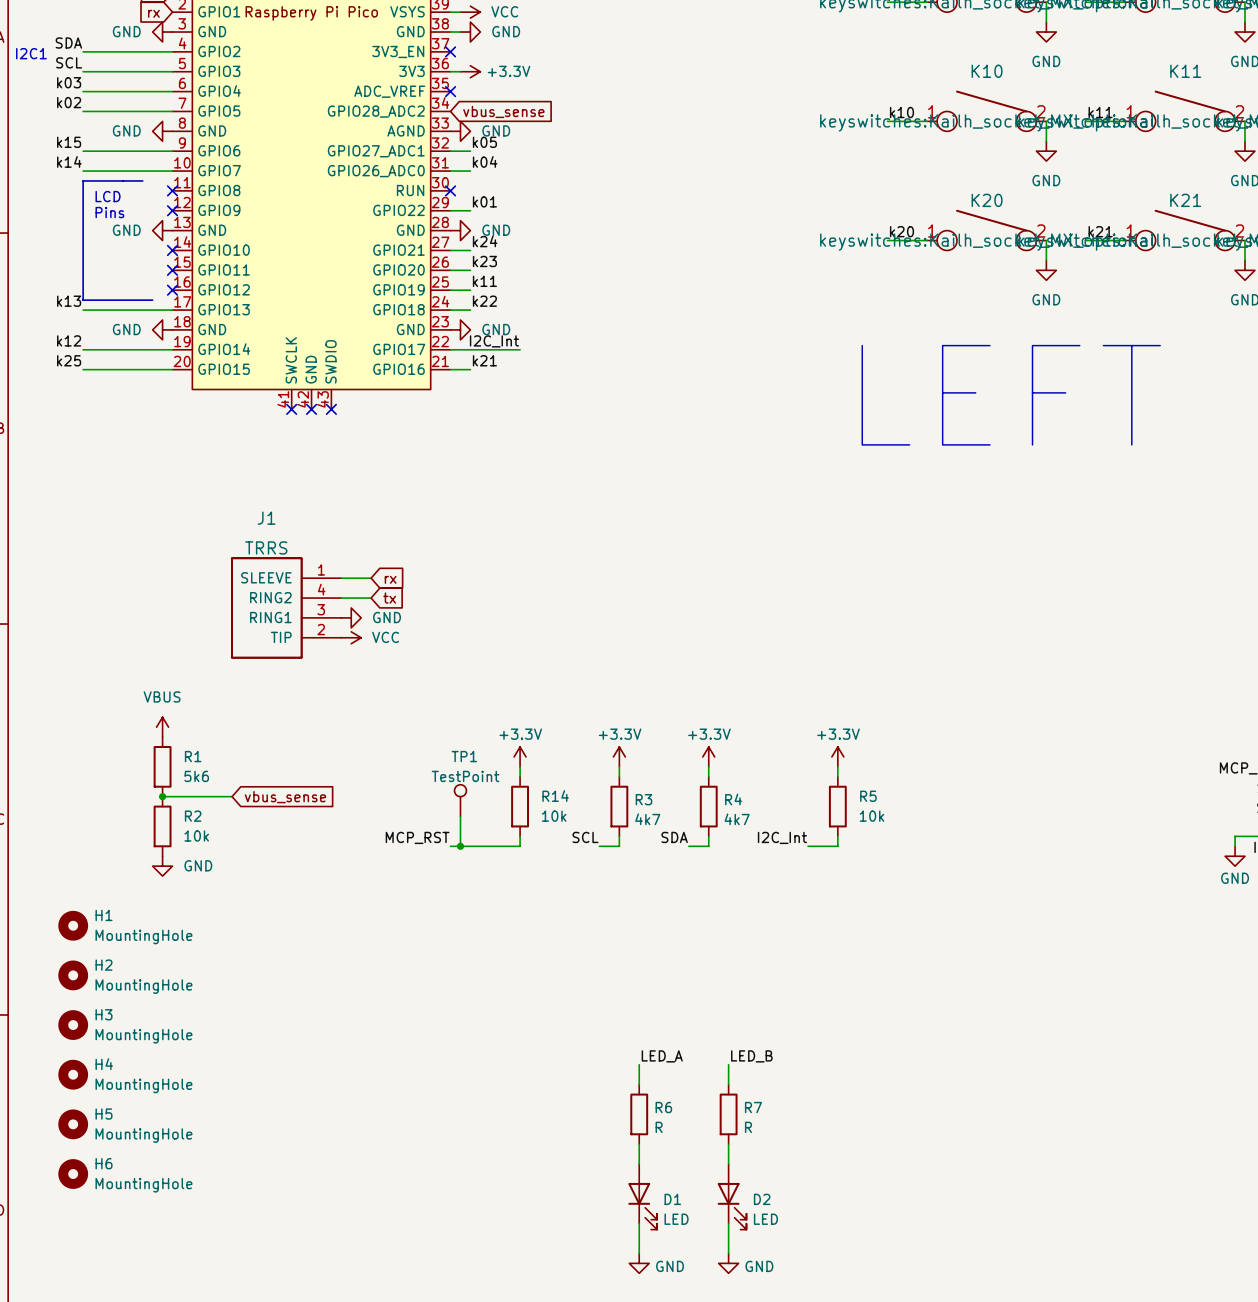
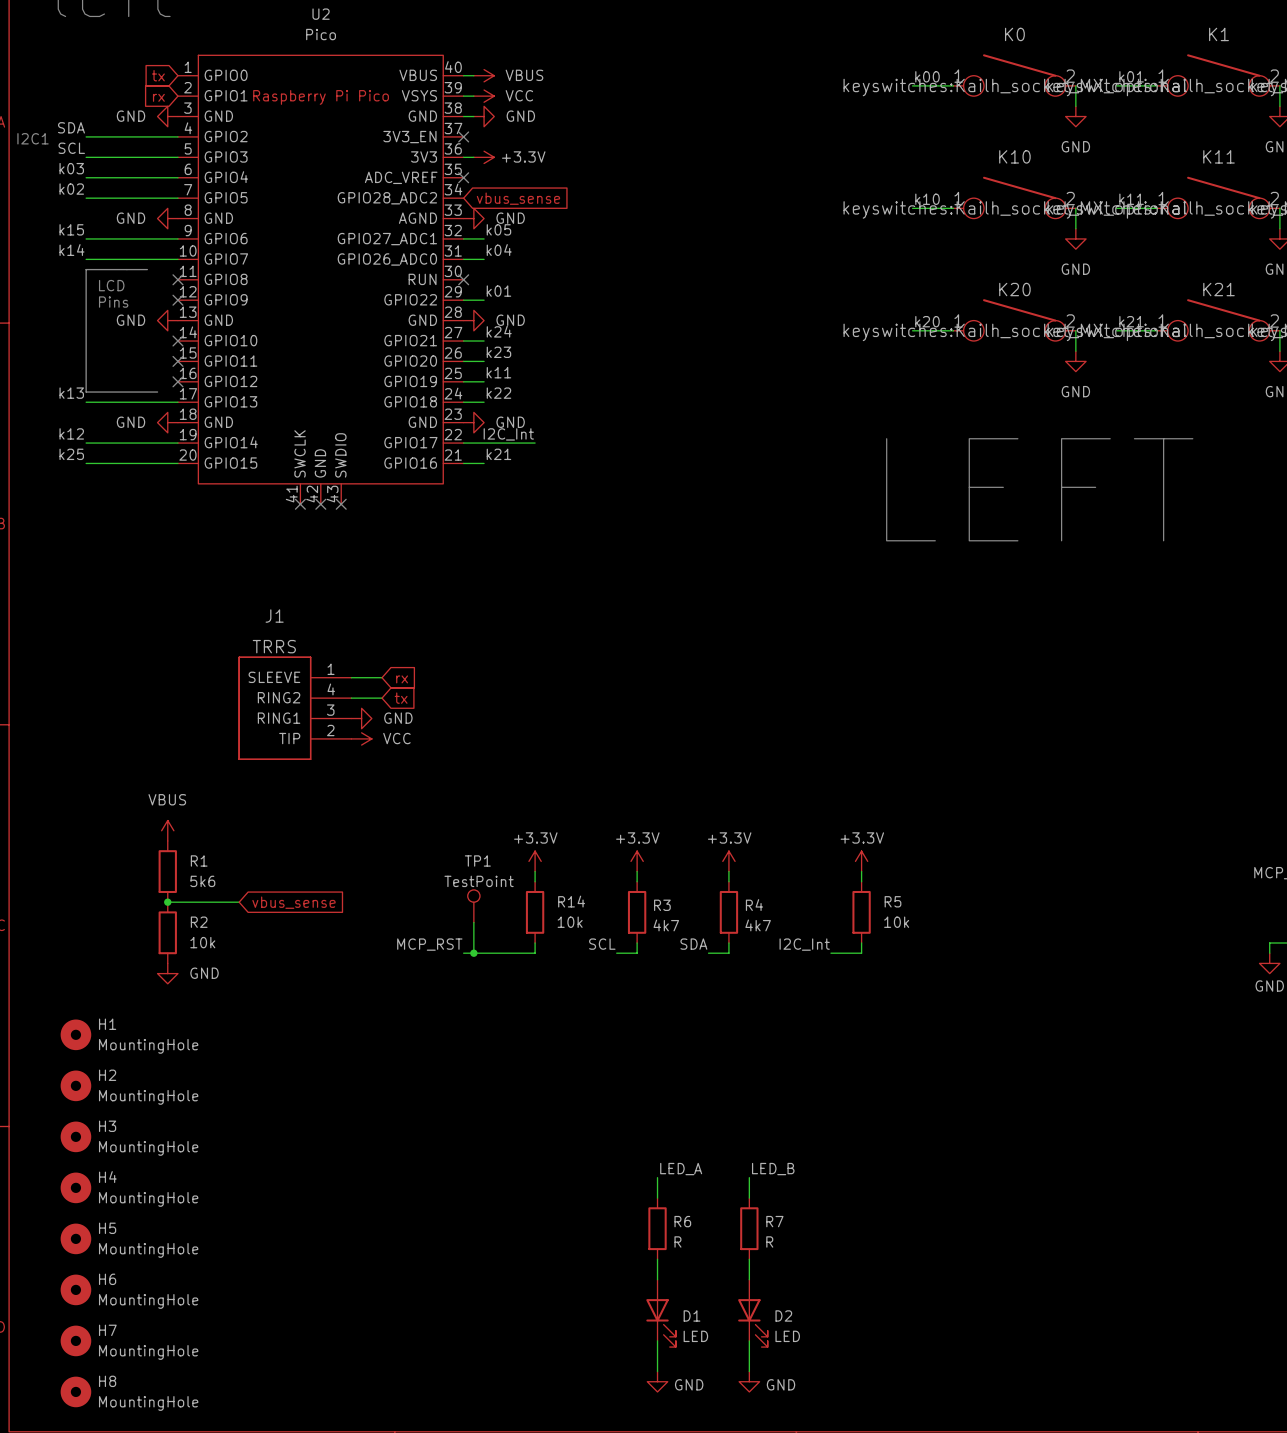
H7: none -> MountingHole (75, 1340)
H8: none -> MountingHole (75, 1391)

